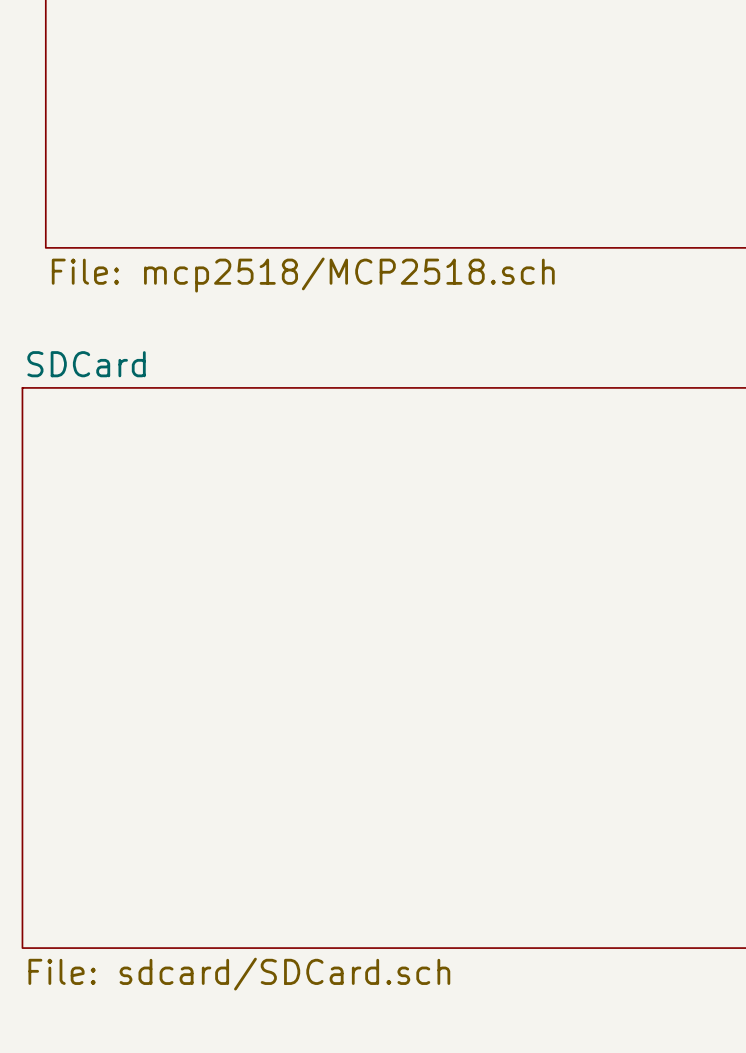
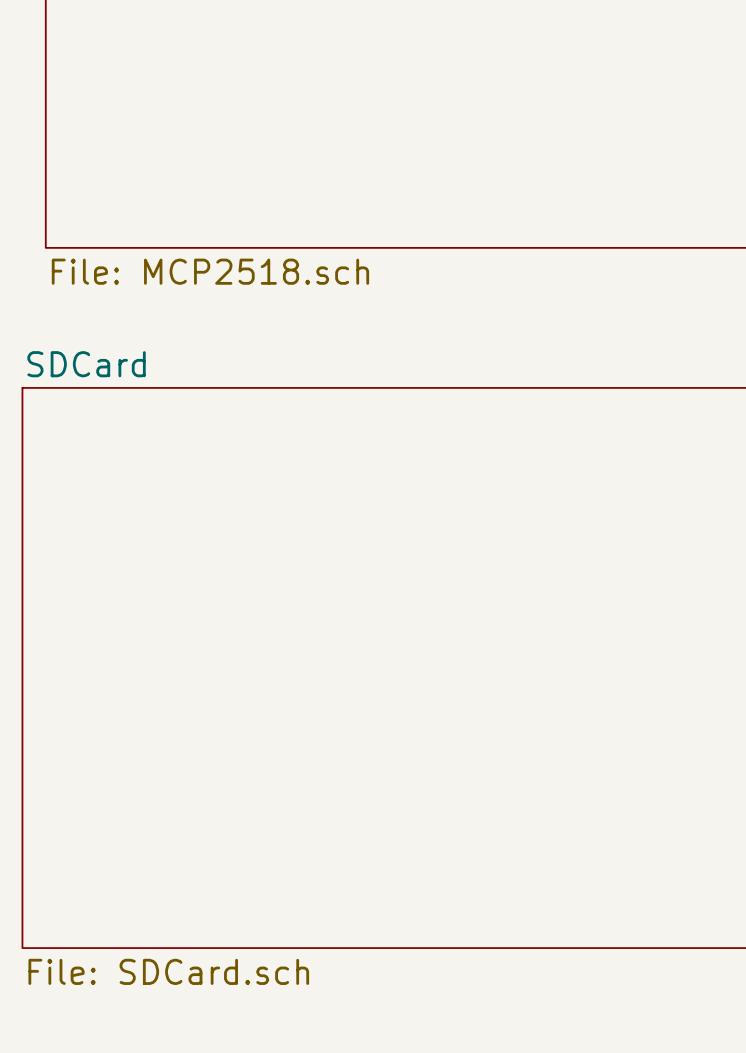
sheet value: File: mcp2518/MCP2518.sch (303, 275) -> File: MCP2518.sch (210, 271)
sheet SDCard value: File: sdcard/SDCard.sch (239, 974) -> File: SDCard.sch (168, 971)

